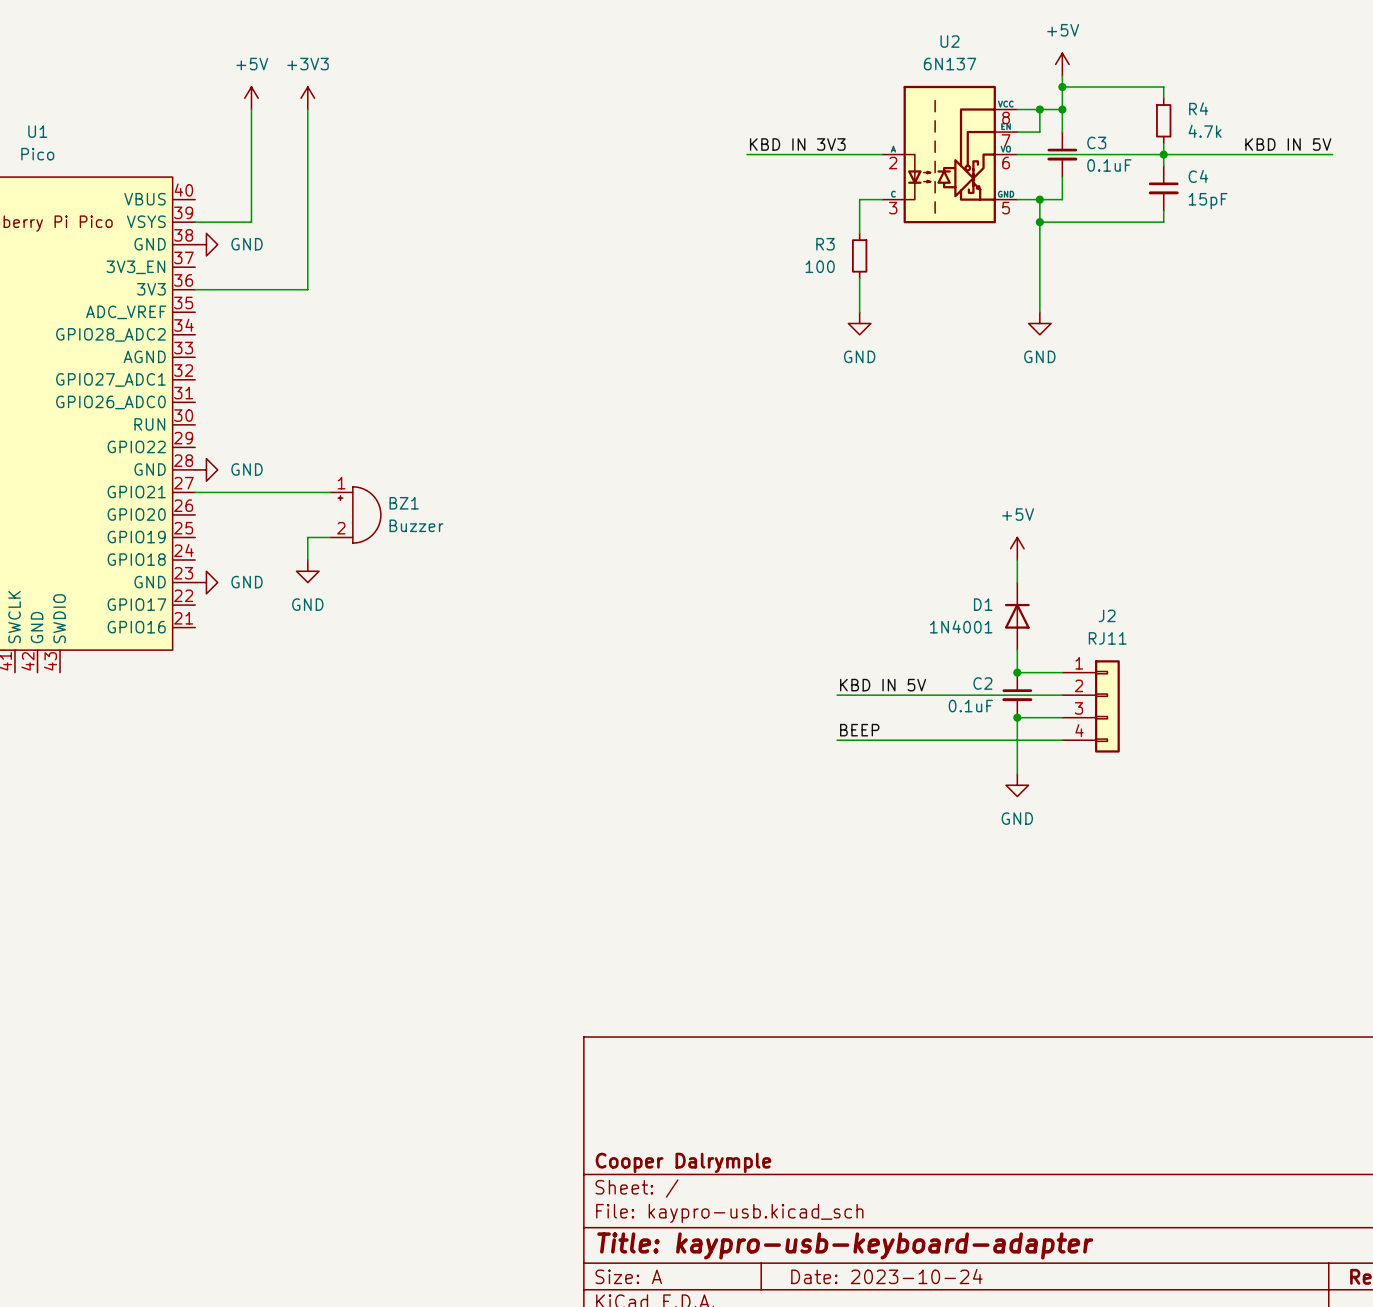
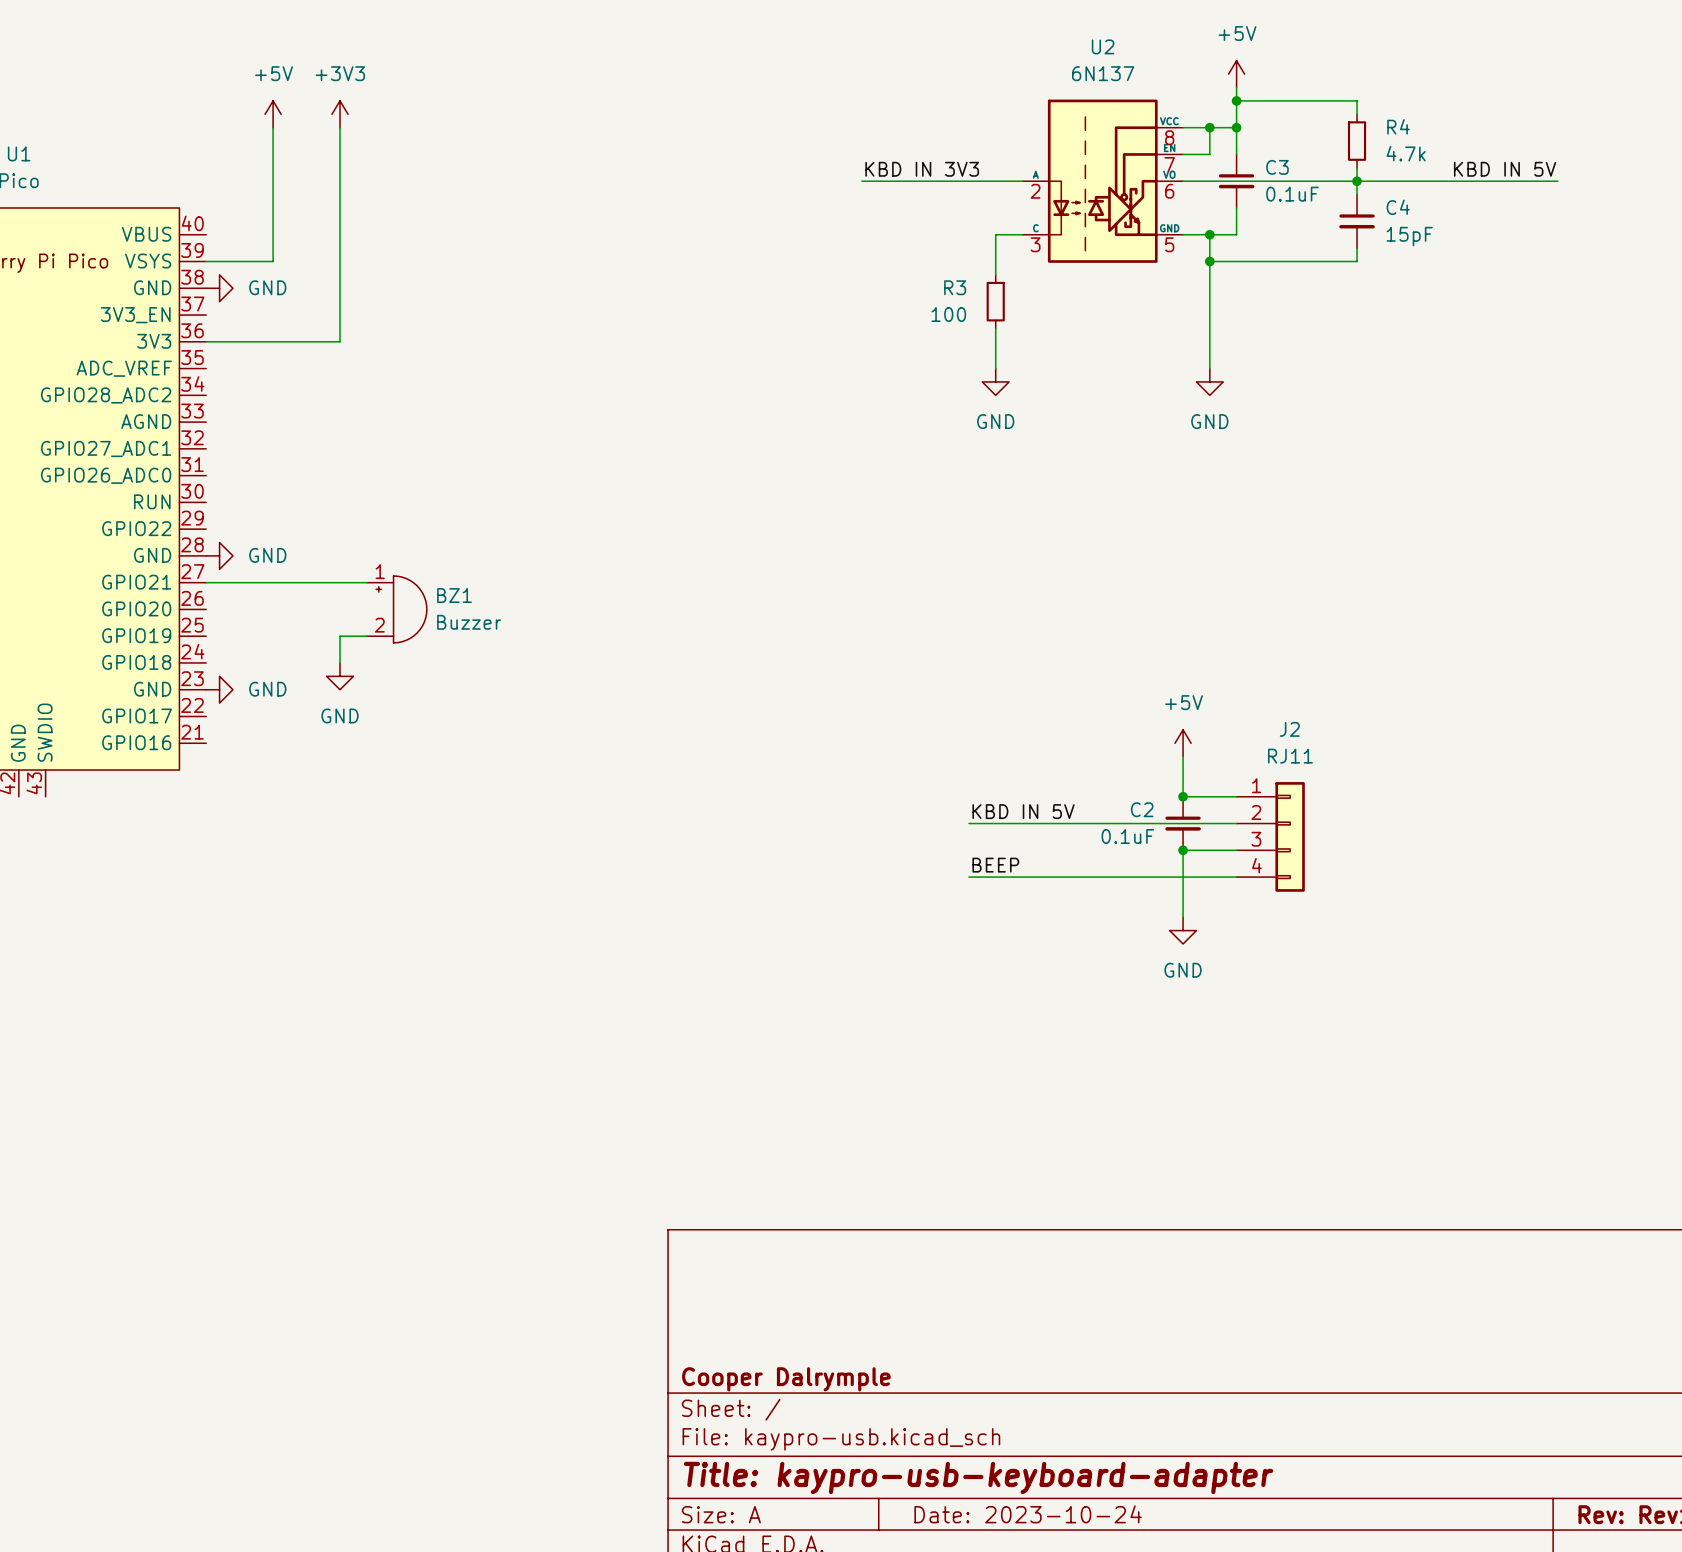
power symbol position: +5V (1017, 548) -> +5V (1183, 743)
wire: (1017, 560) (1017, 582) -> none
D1: 1N4001 (1017, 616) -> none

